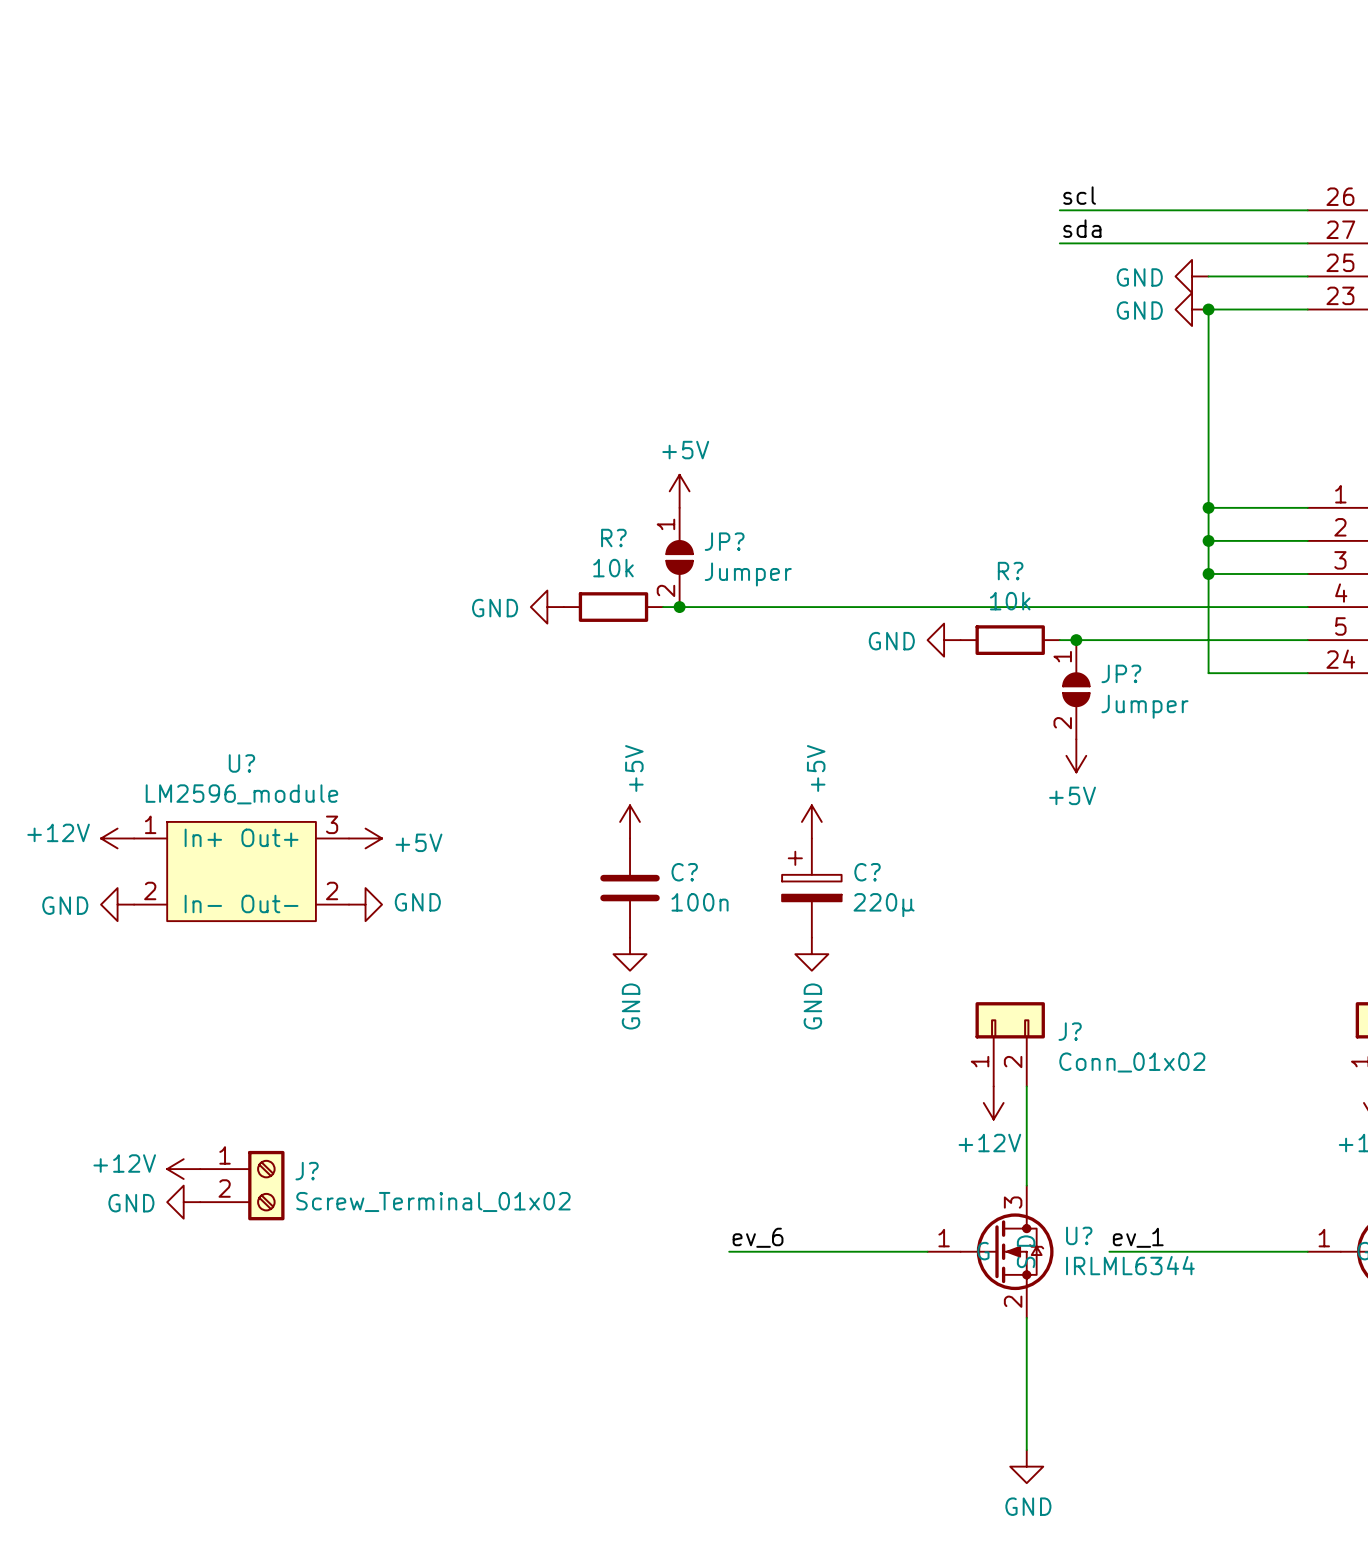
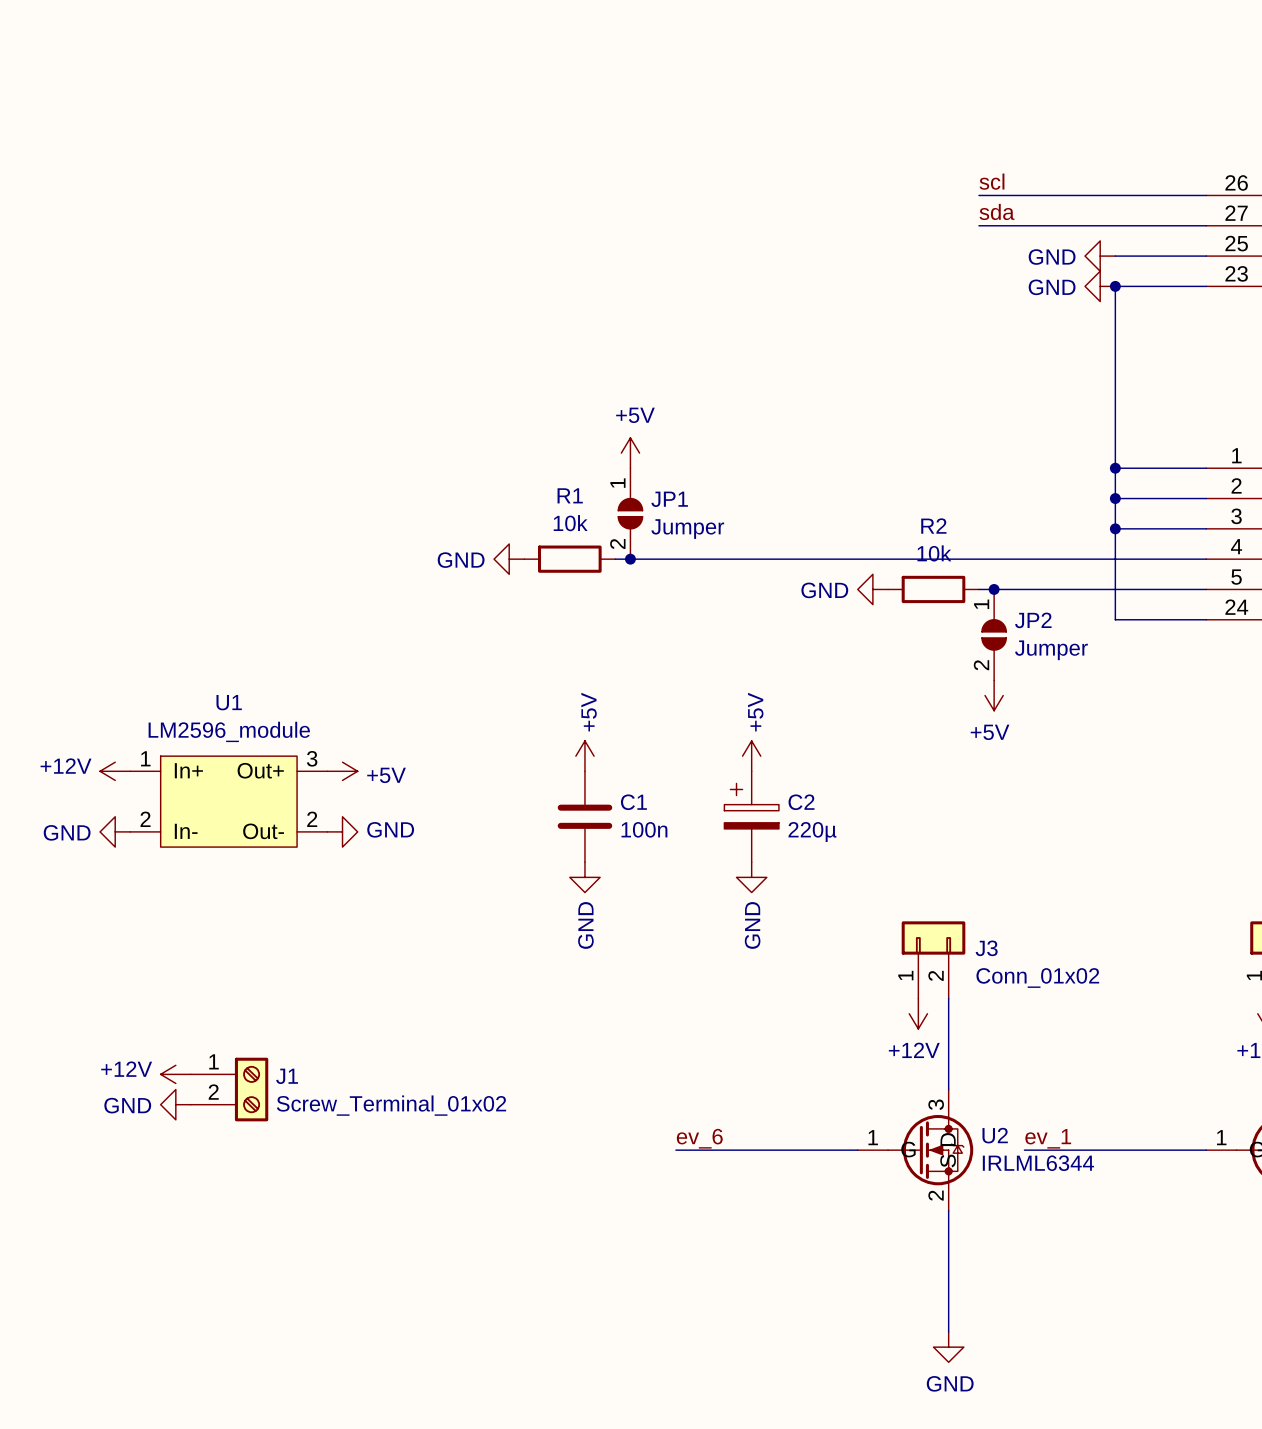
R? name: R? (613, 538) -> R1 (570, 495)
JP? name: JP? (724, 541) -> JP1 (669, 499)
R? name: R? (1010, 571) -> R2 (933, 526)
JP? name: JP? (1121, 673) -> JP2 (1033, 620)
U? name: U? (241, 763) -> U1 (229, 702)
C? name: C? (684, 872) -> C1 (633, 802)
C? name: C? (867, 872) -> C2 (801, 802)
J? name: J? (1070, 1031) -> J3 (986, 948)
J? name: J? (307, 1171) -> J1 (287, 1076)
U? name: U? (1079, 1235) -> U2 (995, 1135)

